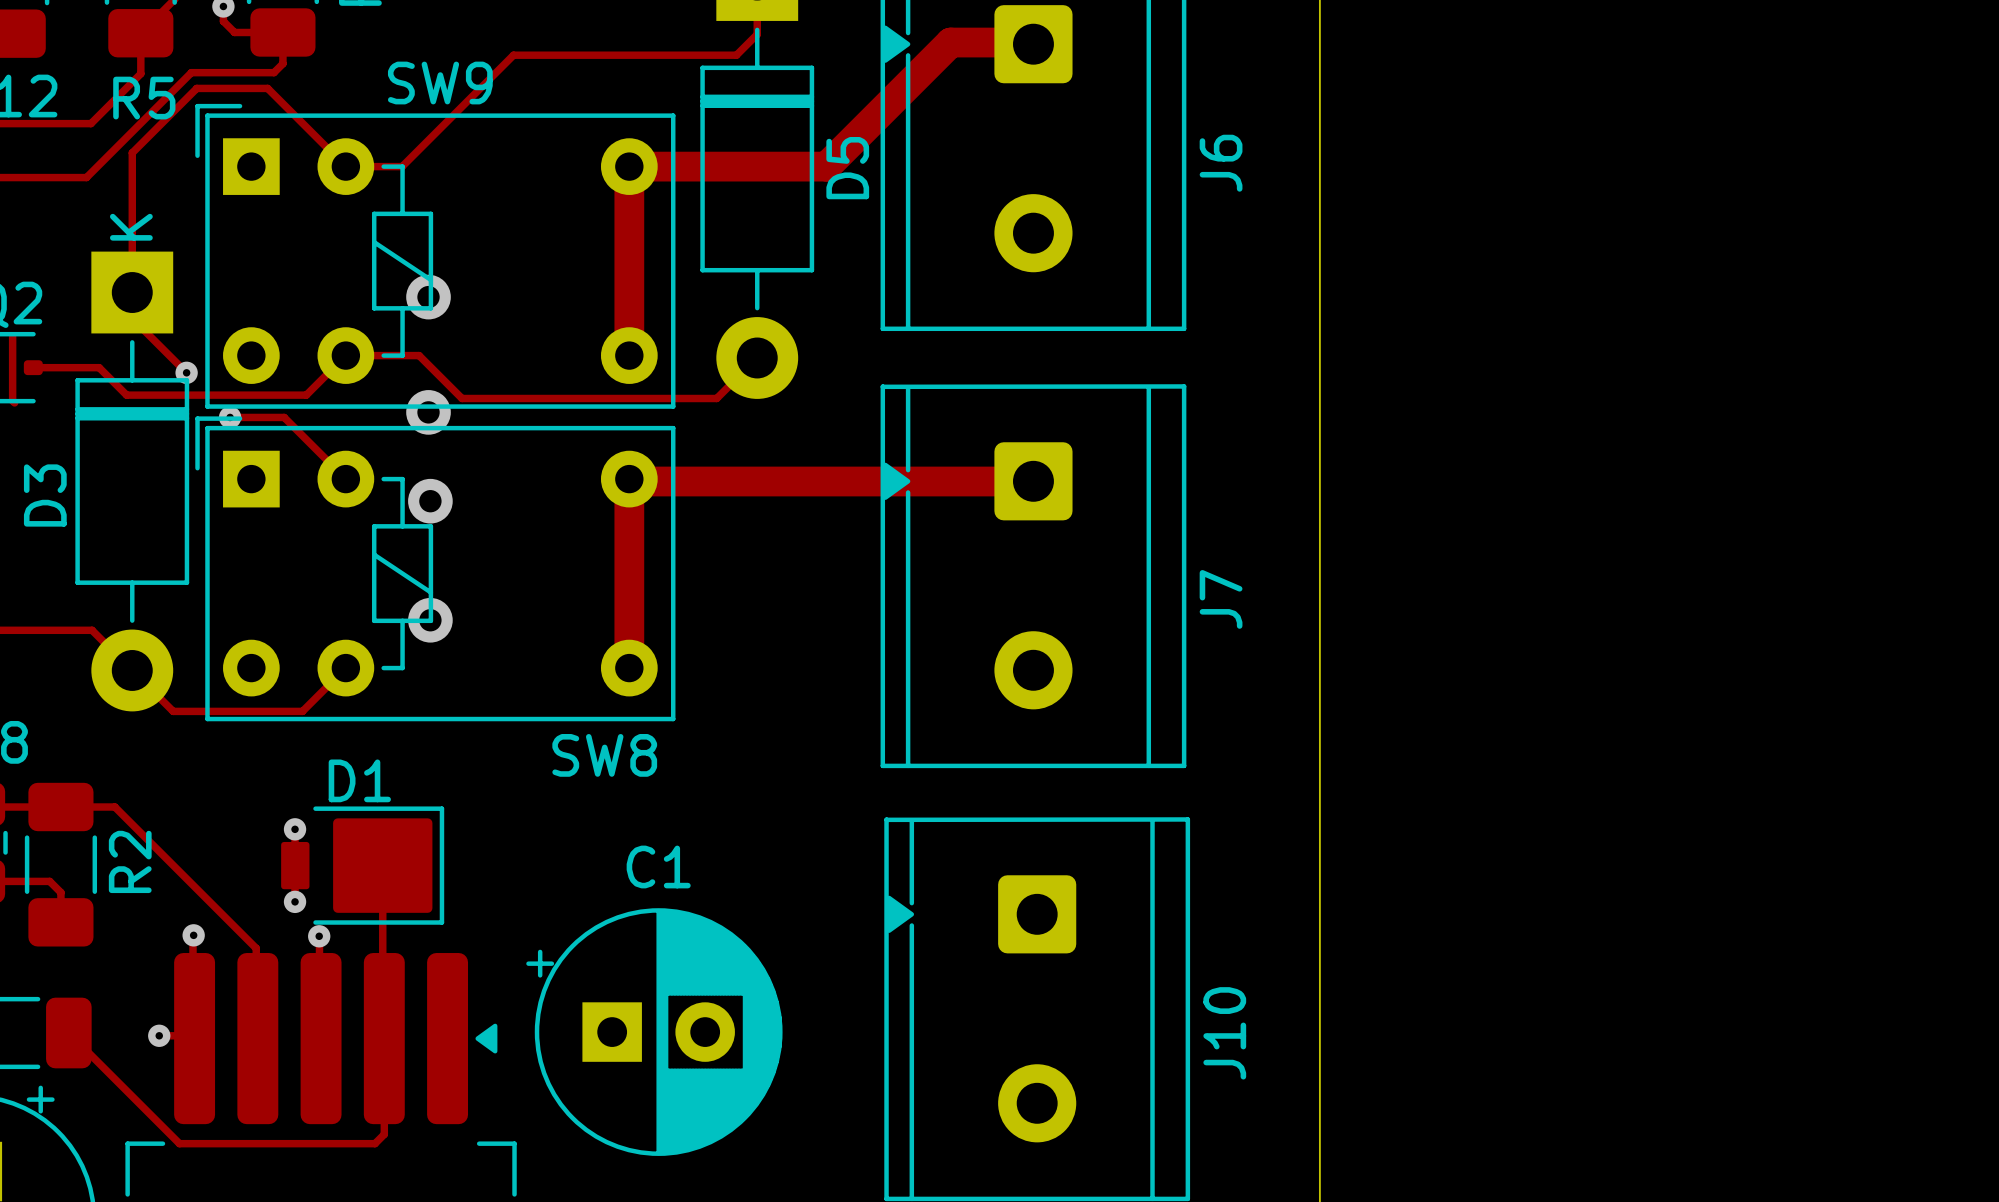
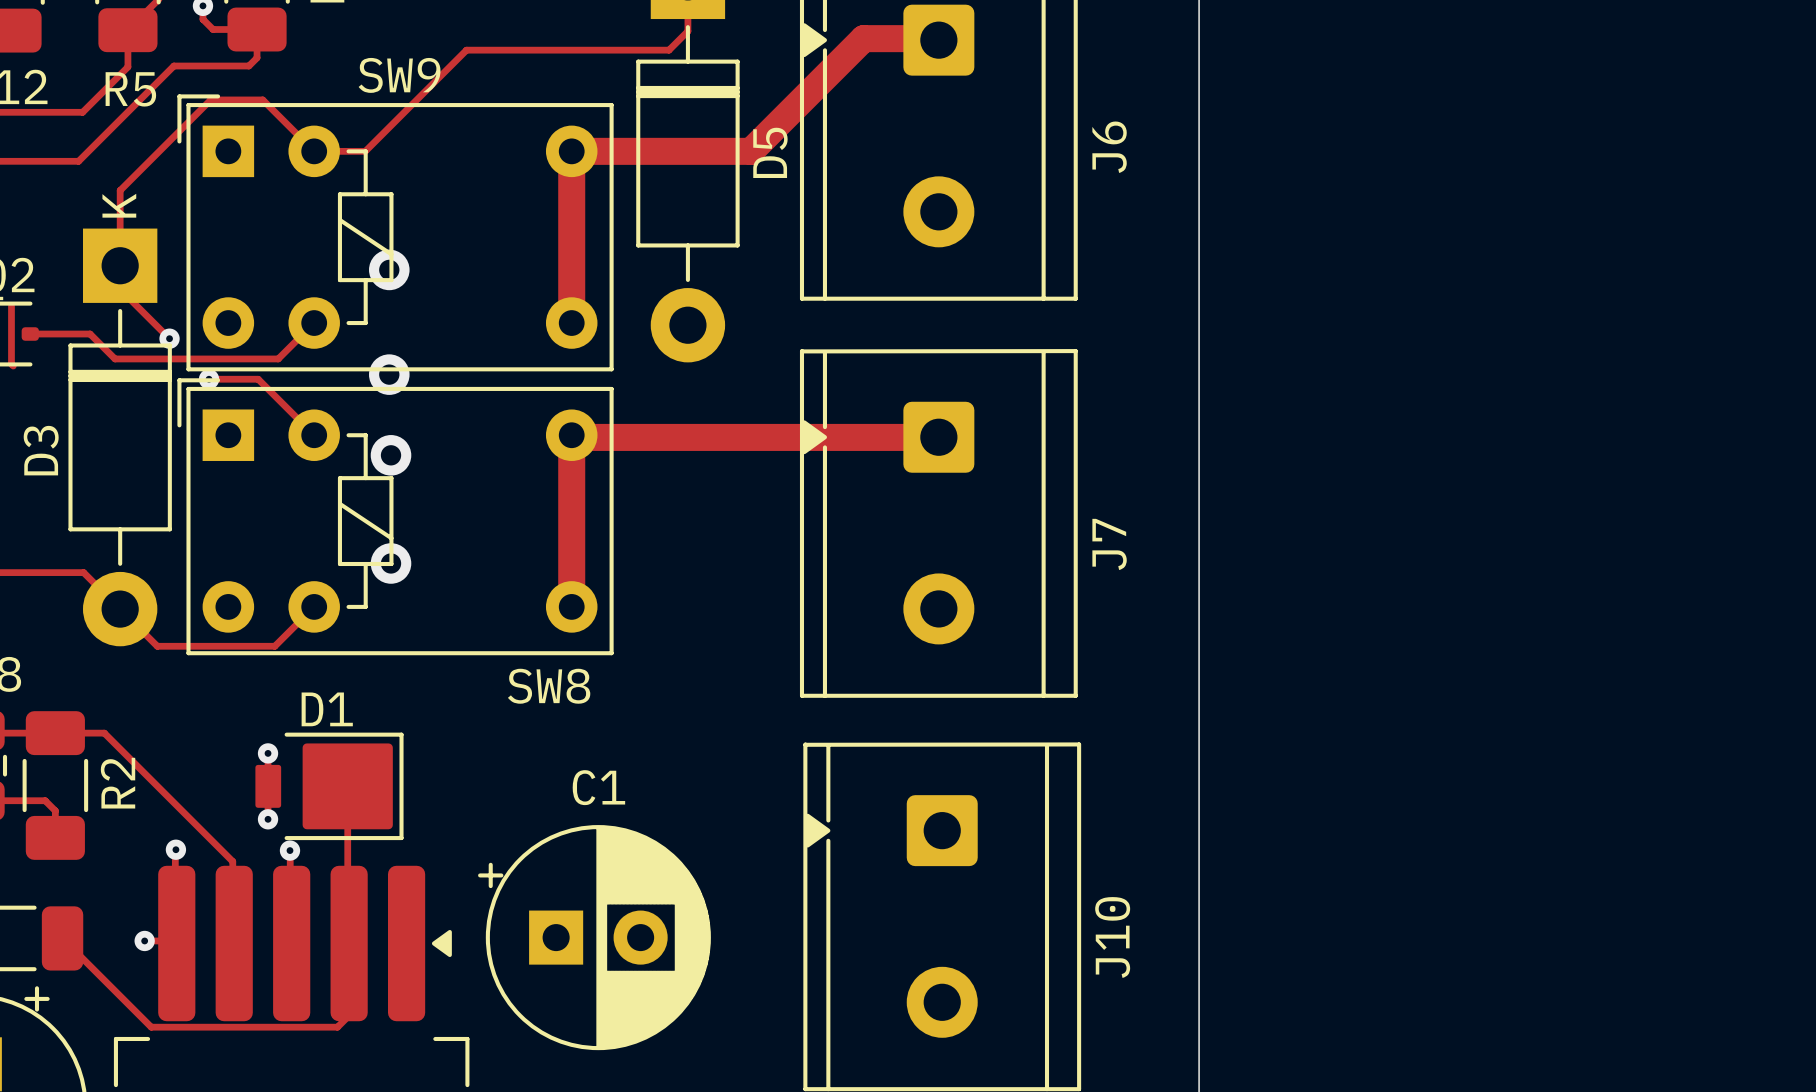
track: (289, 110) (267, 88) (196, 88) (132, 152) (132, 209) -> (262, 99) (210, 99) (120, 190)
track: (345, 355) (419, 355) (462, 398) (716, 398) (757, 357) -> none
track: (384, 1038) (384, 1134) (375, 1143) (179, 1143) (166, 1130) -> (347, 1017) (337, 1027) (151, 1027)

